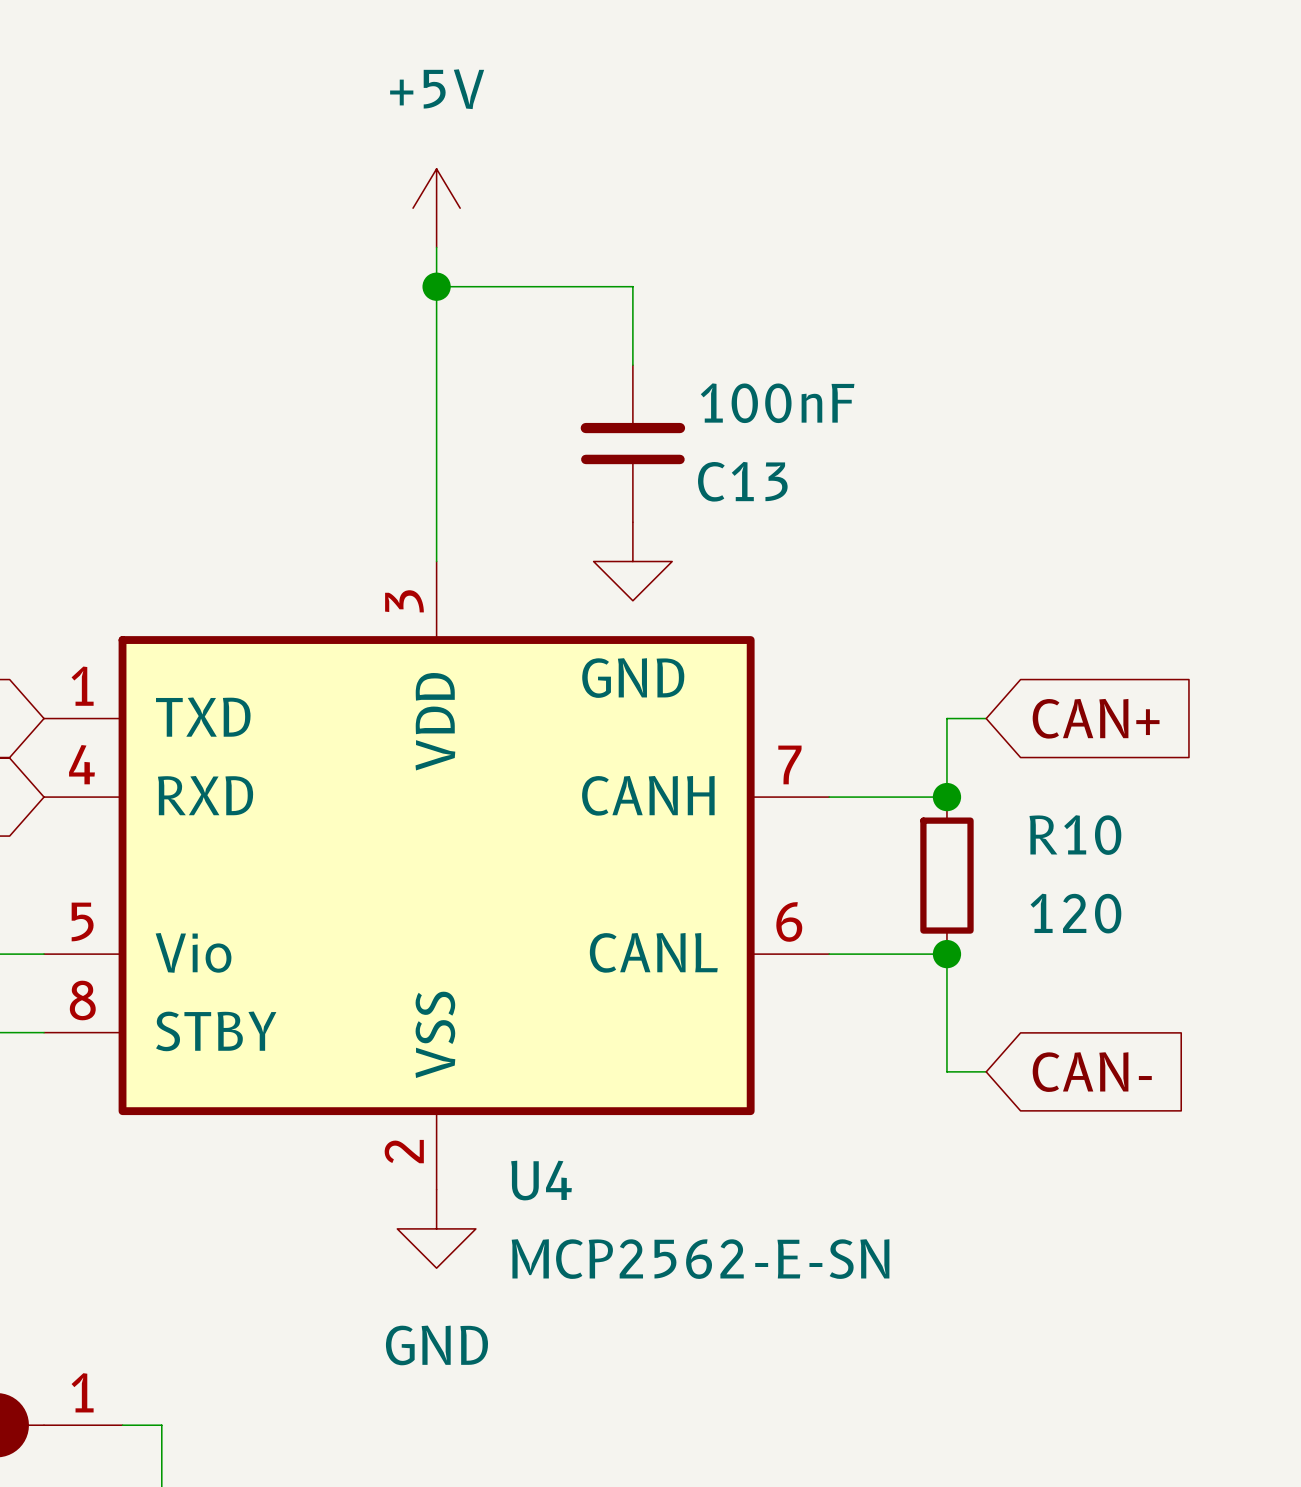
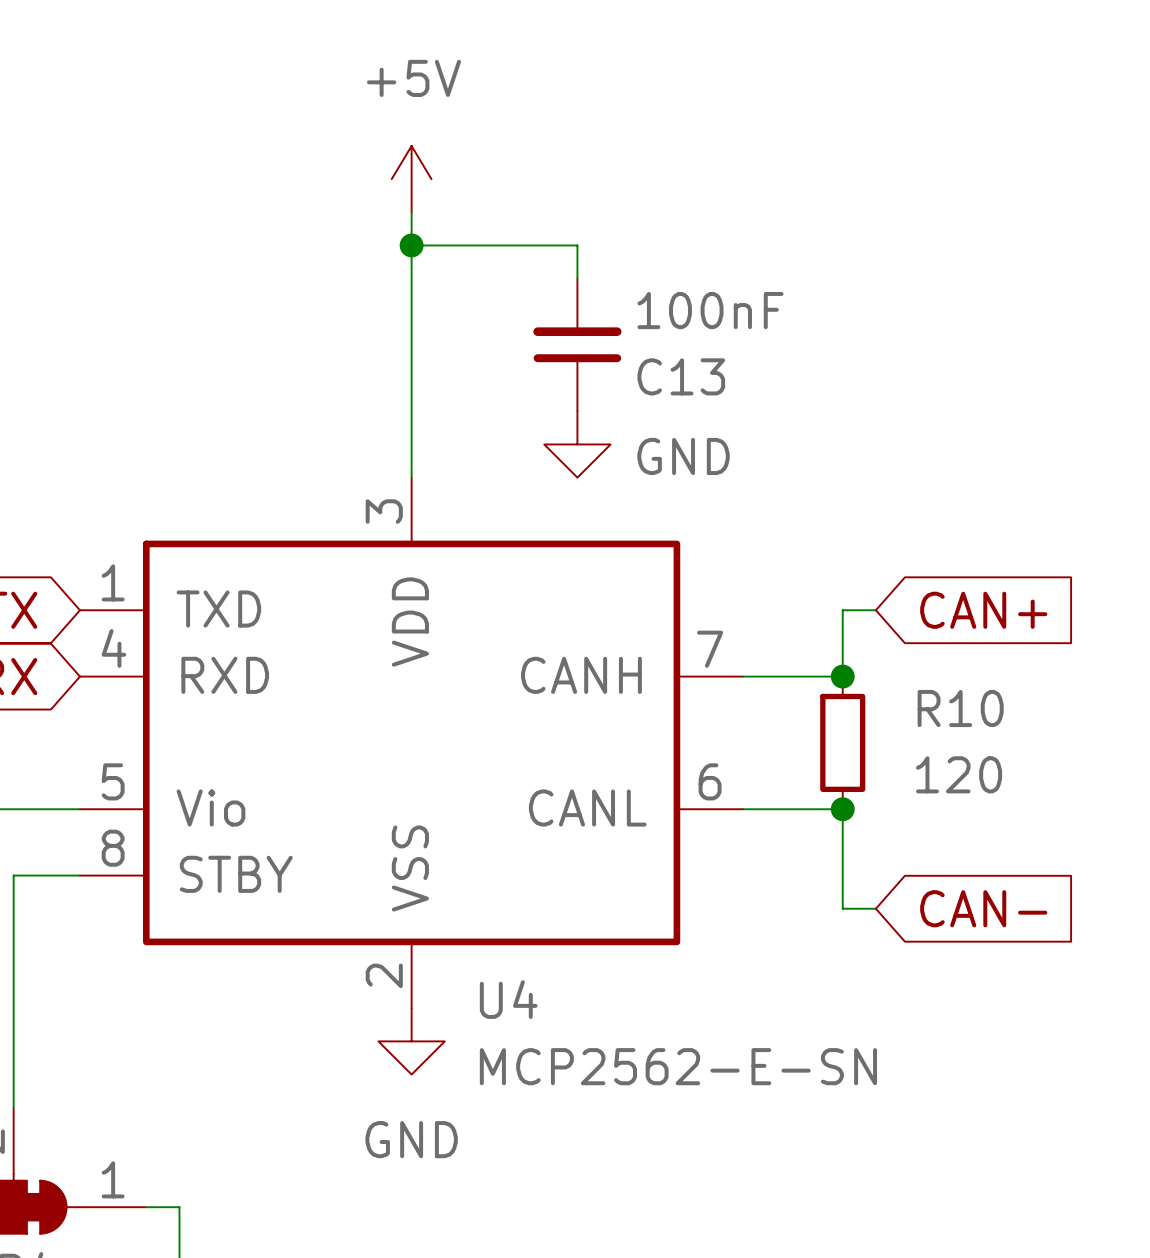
C13 position: (632, 443) -> (577, 344)
power symbol position: GND (632, 561) -> GND (577, 444)
power symbol text position: GND (633, 678) -> GND (683, 456)

